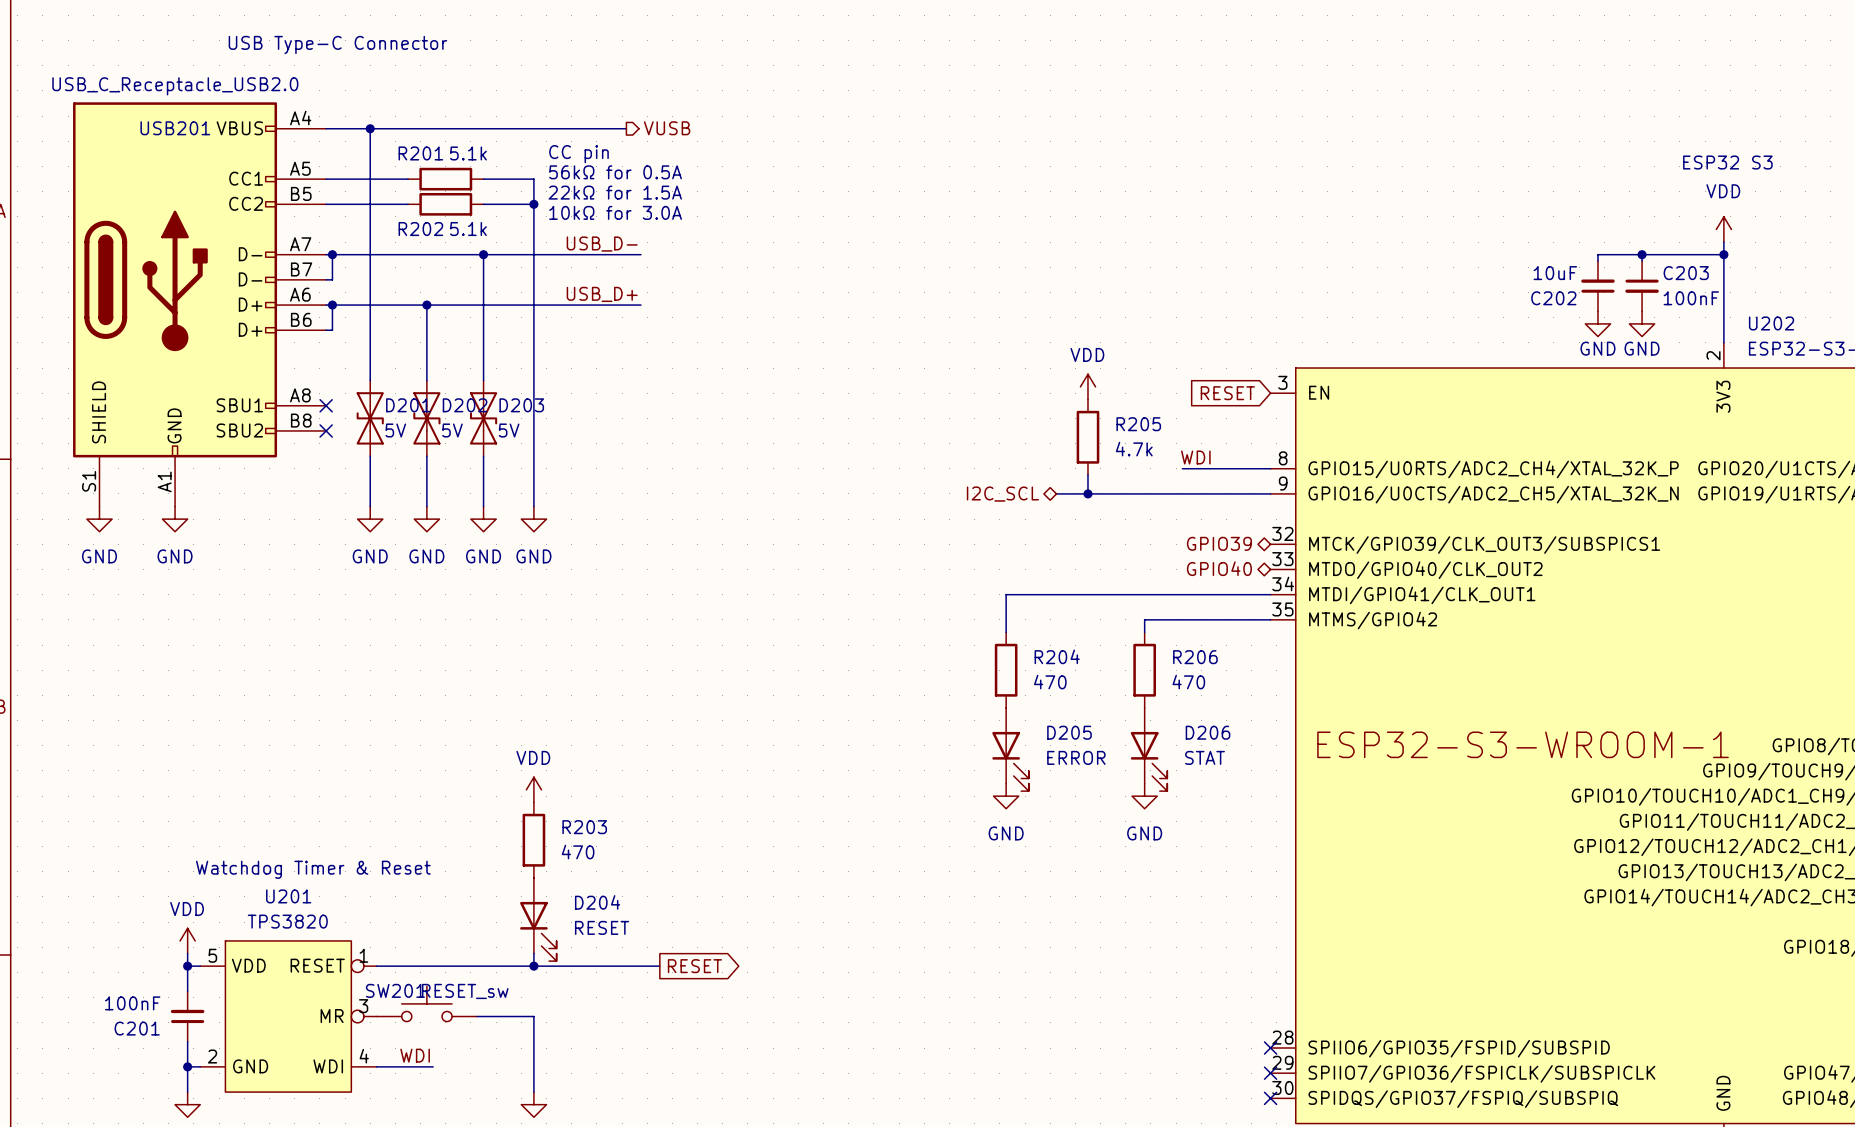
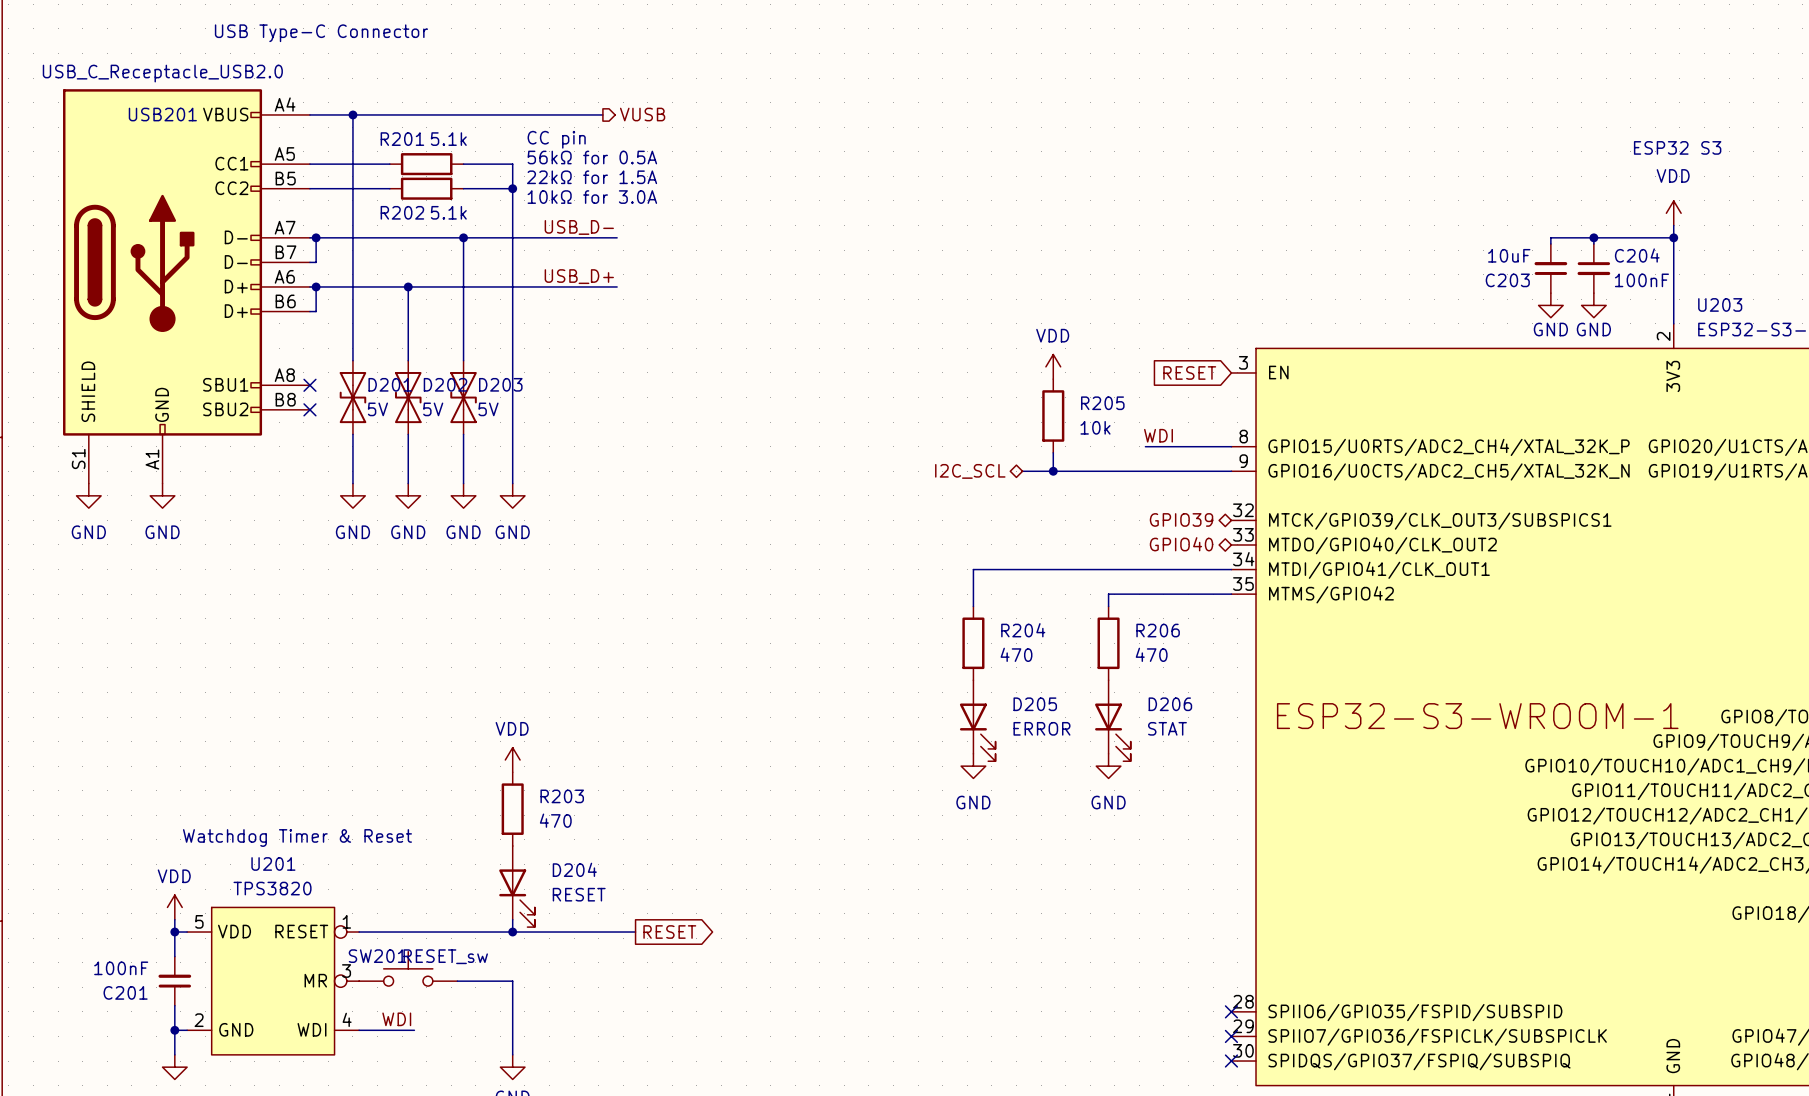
C203 name: C203 (1686, 273) -> C204 (1637, 255)
C202 name: C202 (1553, 298) -> C203 (1507, 280)
U202 name: U202 (1771, 323) -> U203 (1720, 304)
R205 value: 4.7k (1134, 449) -> 10k (1095, 427)

